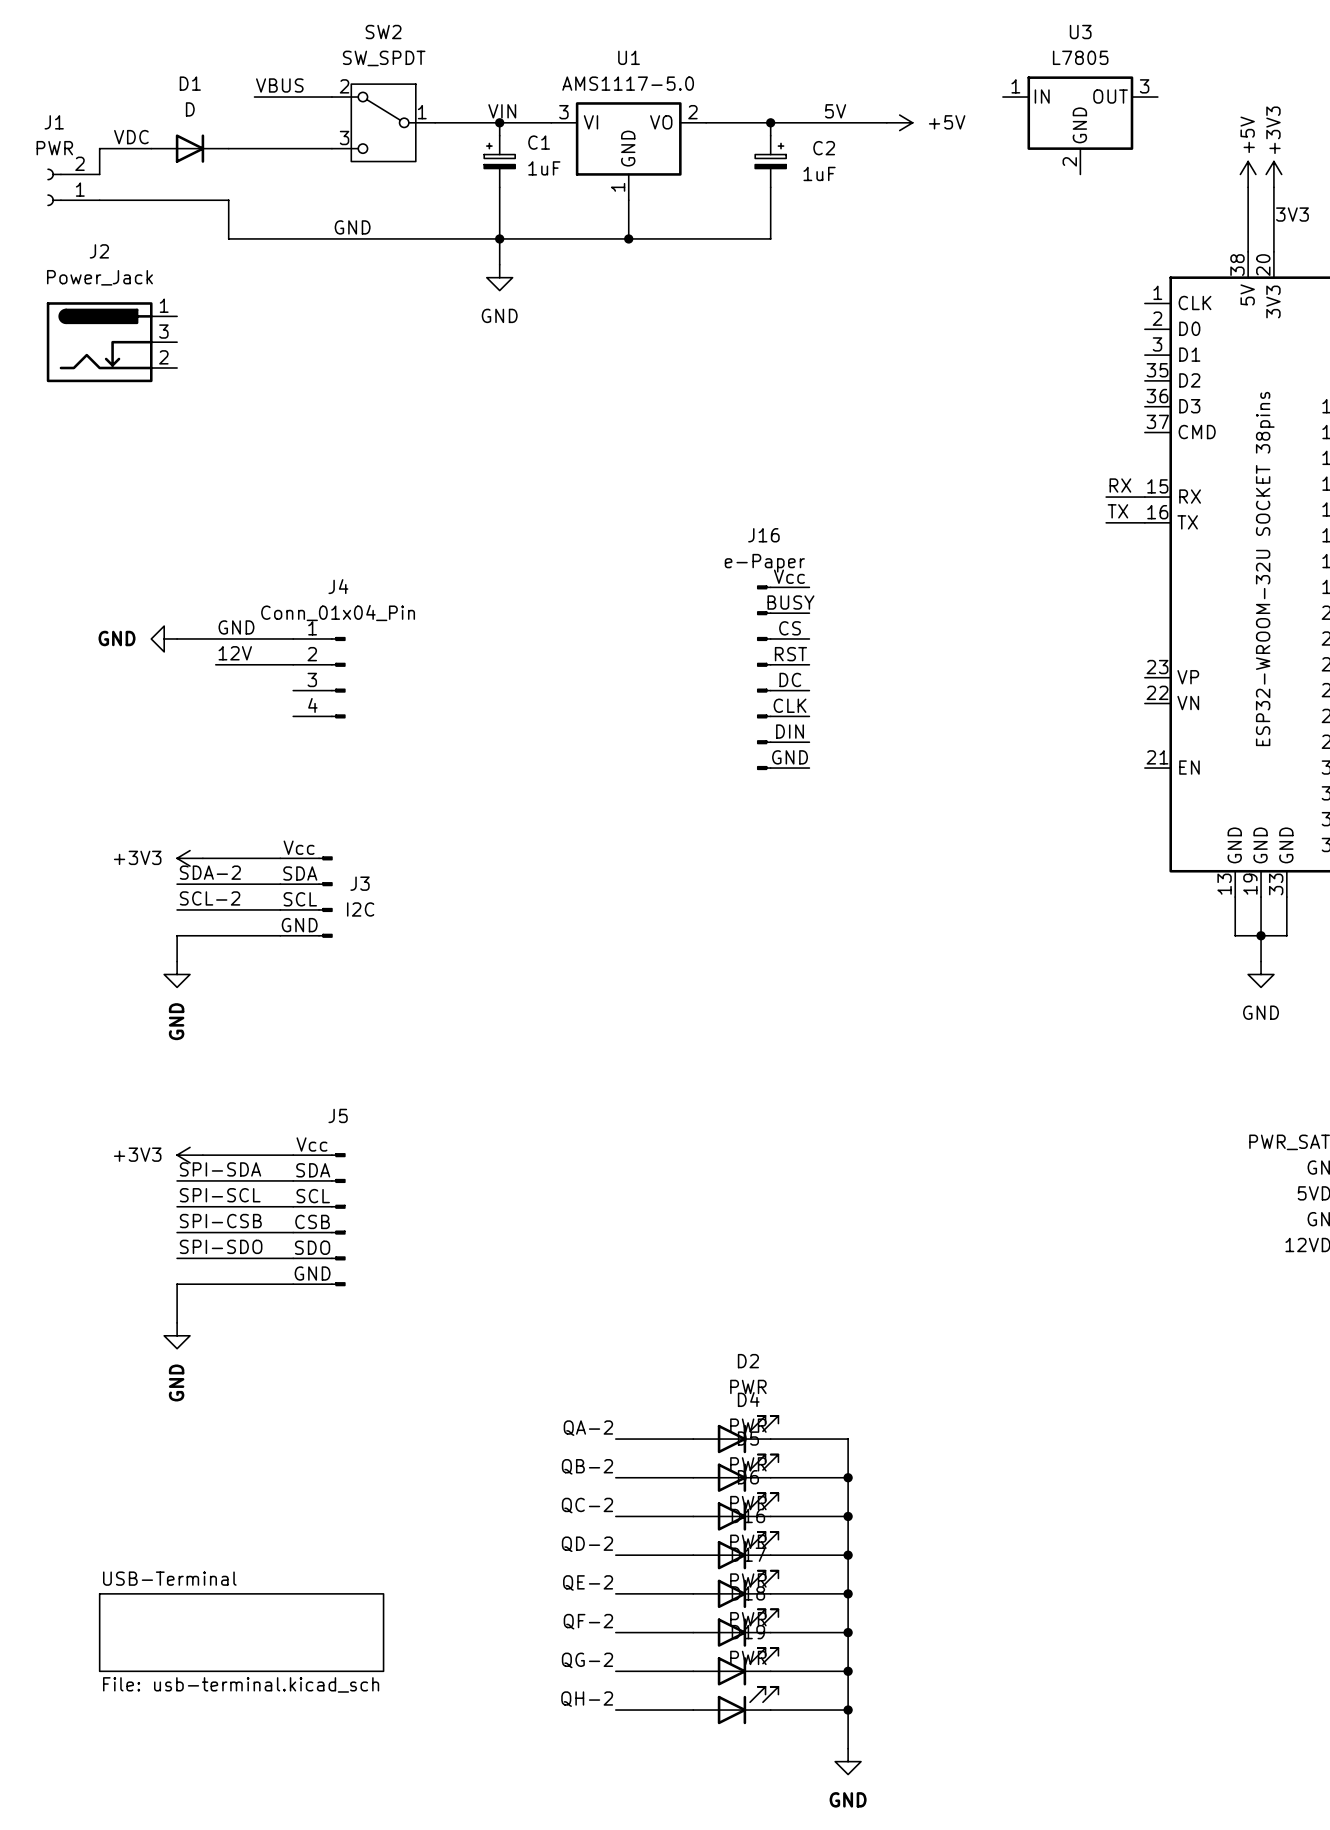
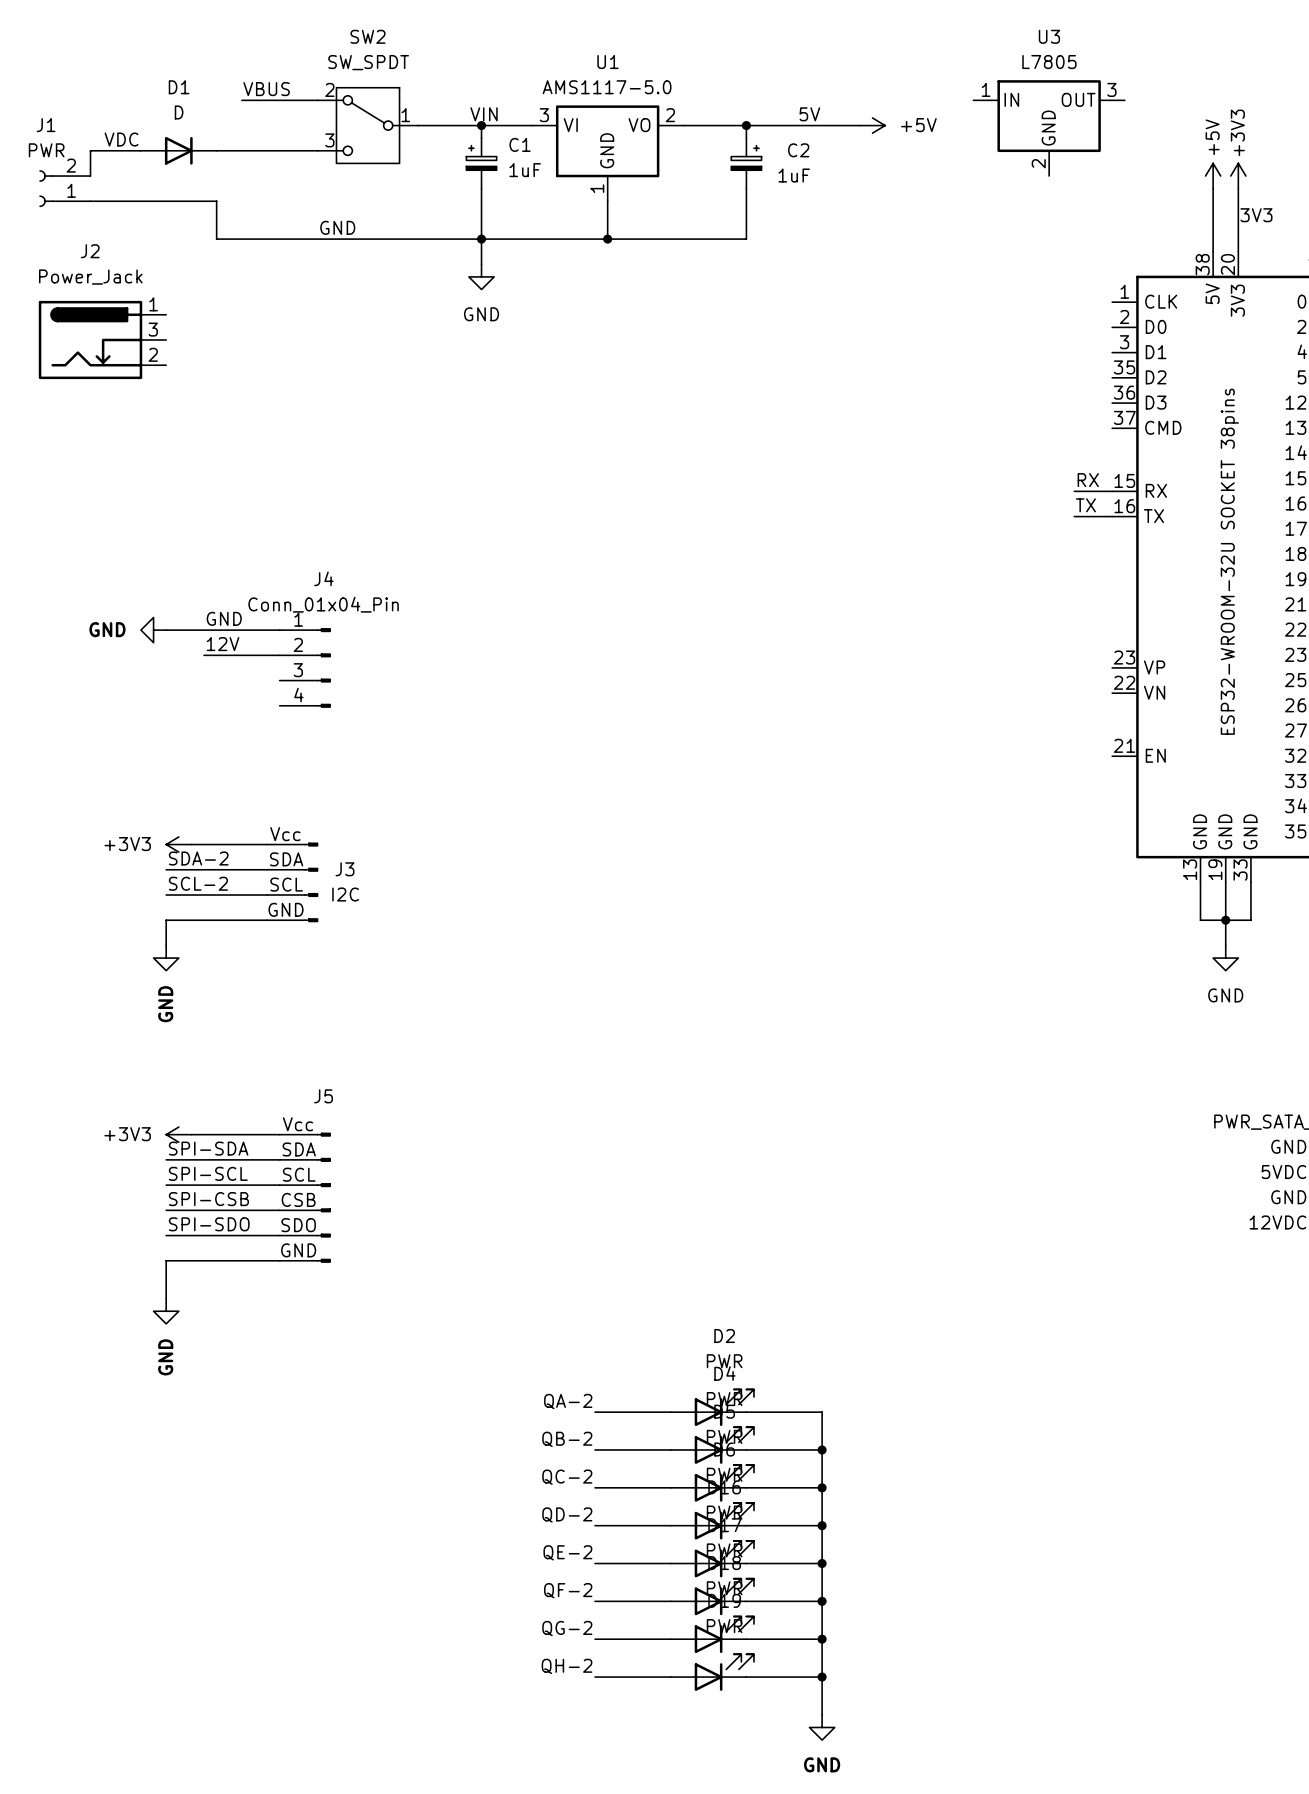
J16: e-Paper (783, 677) -> none
sheet USB-Terminal: File: usb-terminal.kicad_sch (241, 1632) -> none

